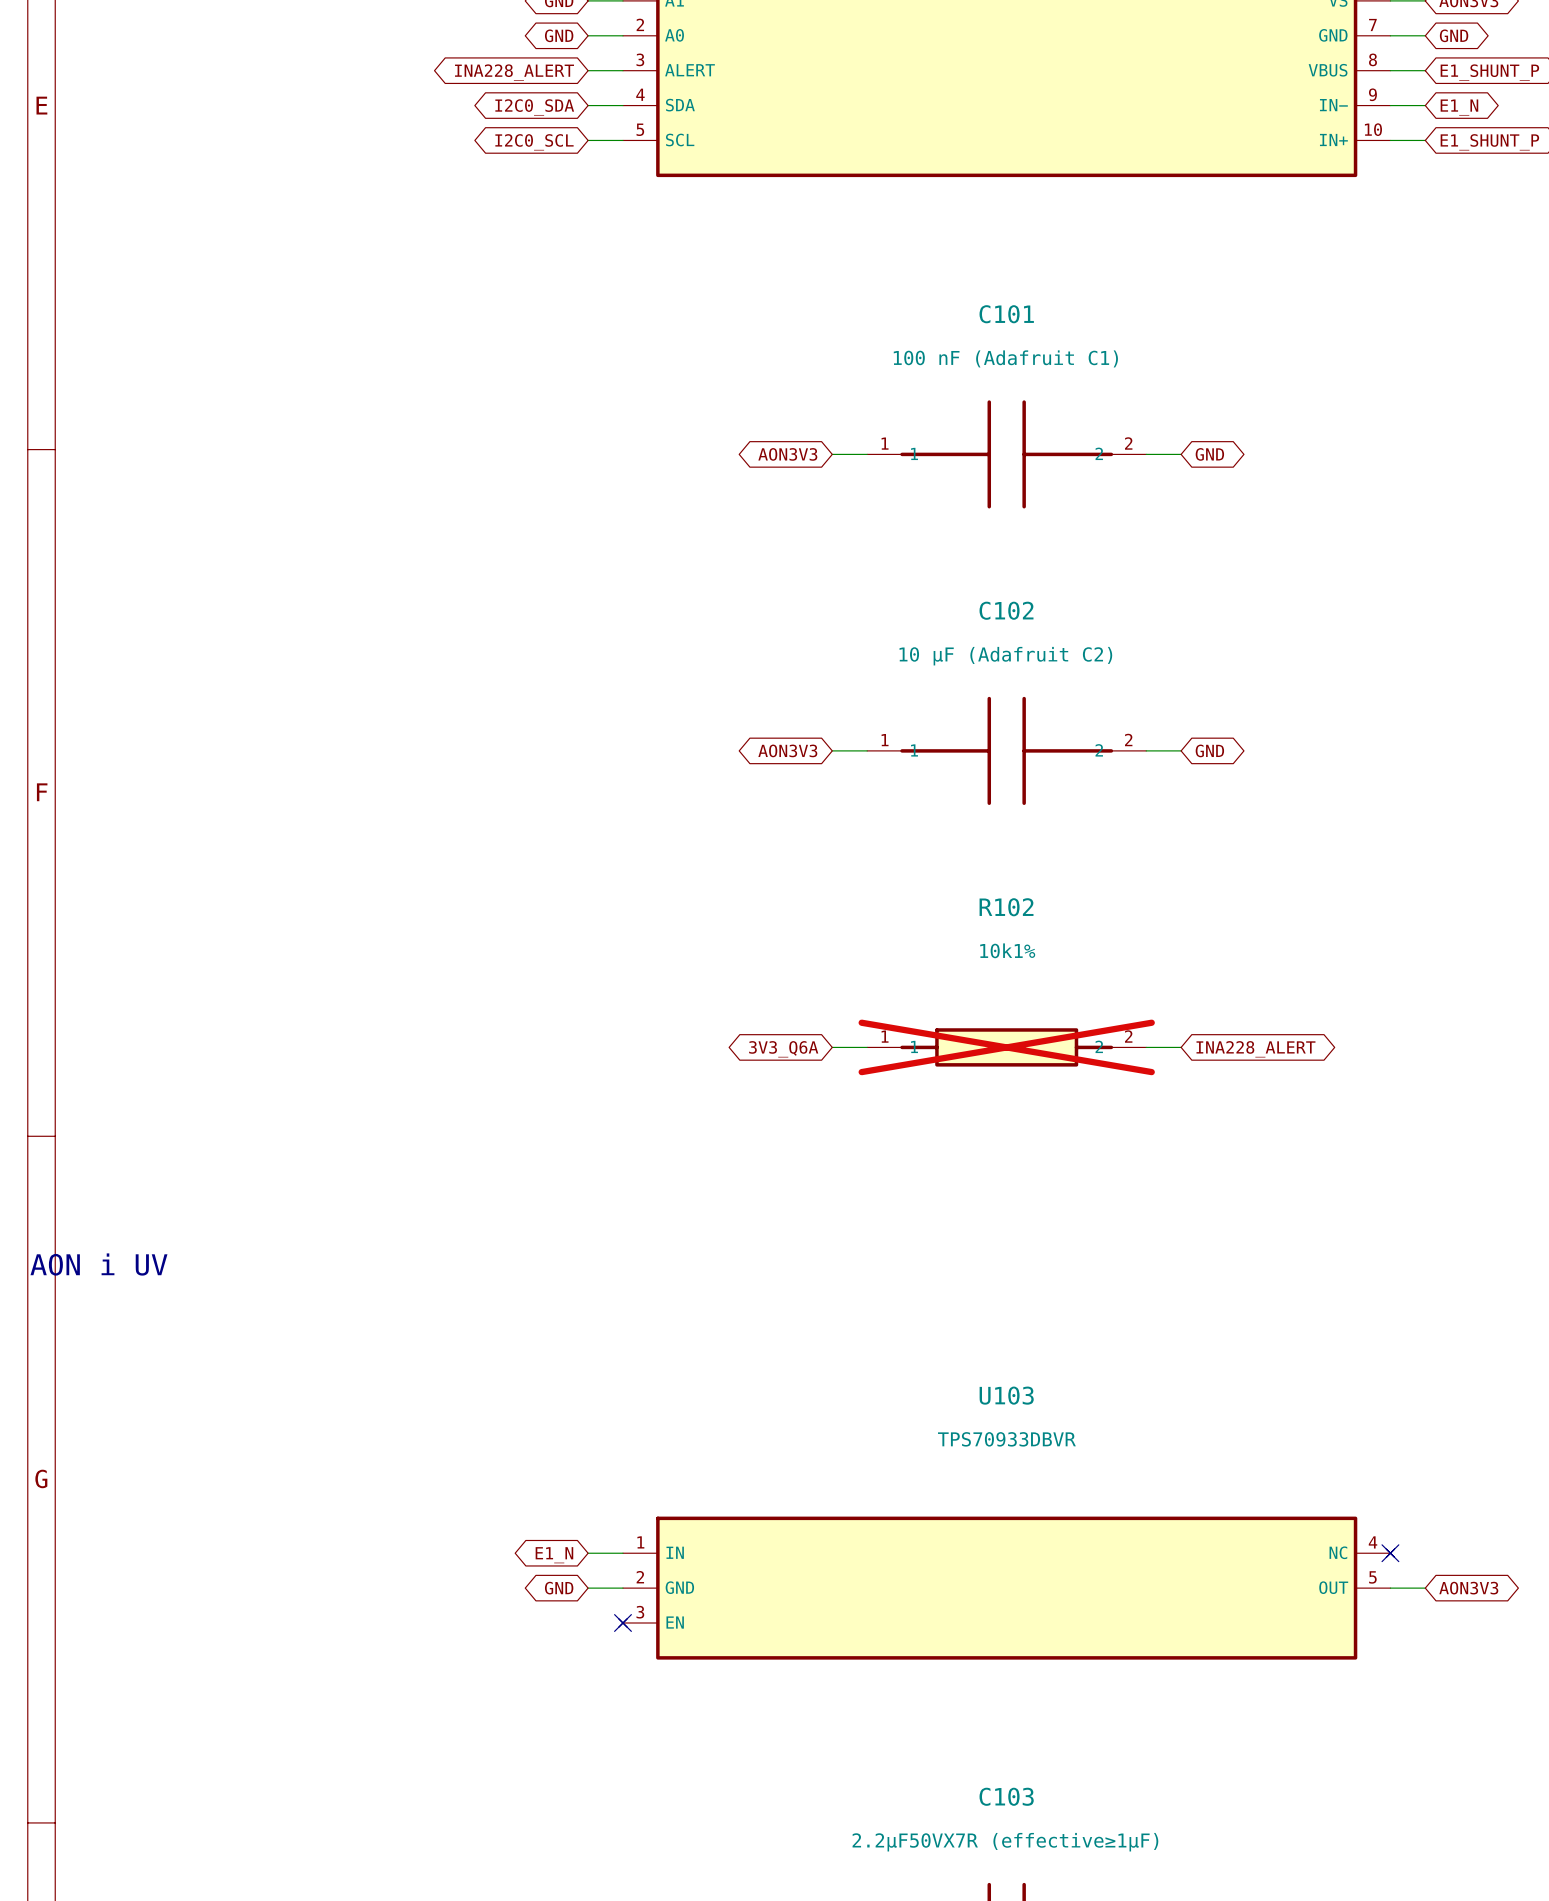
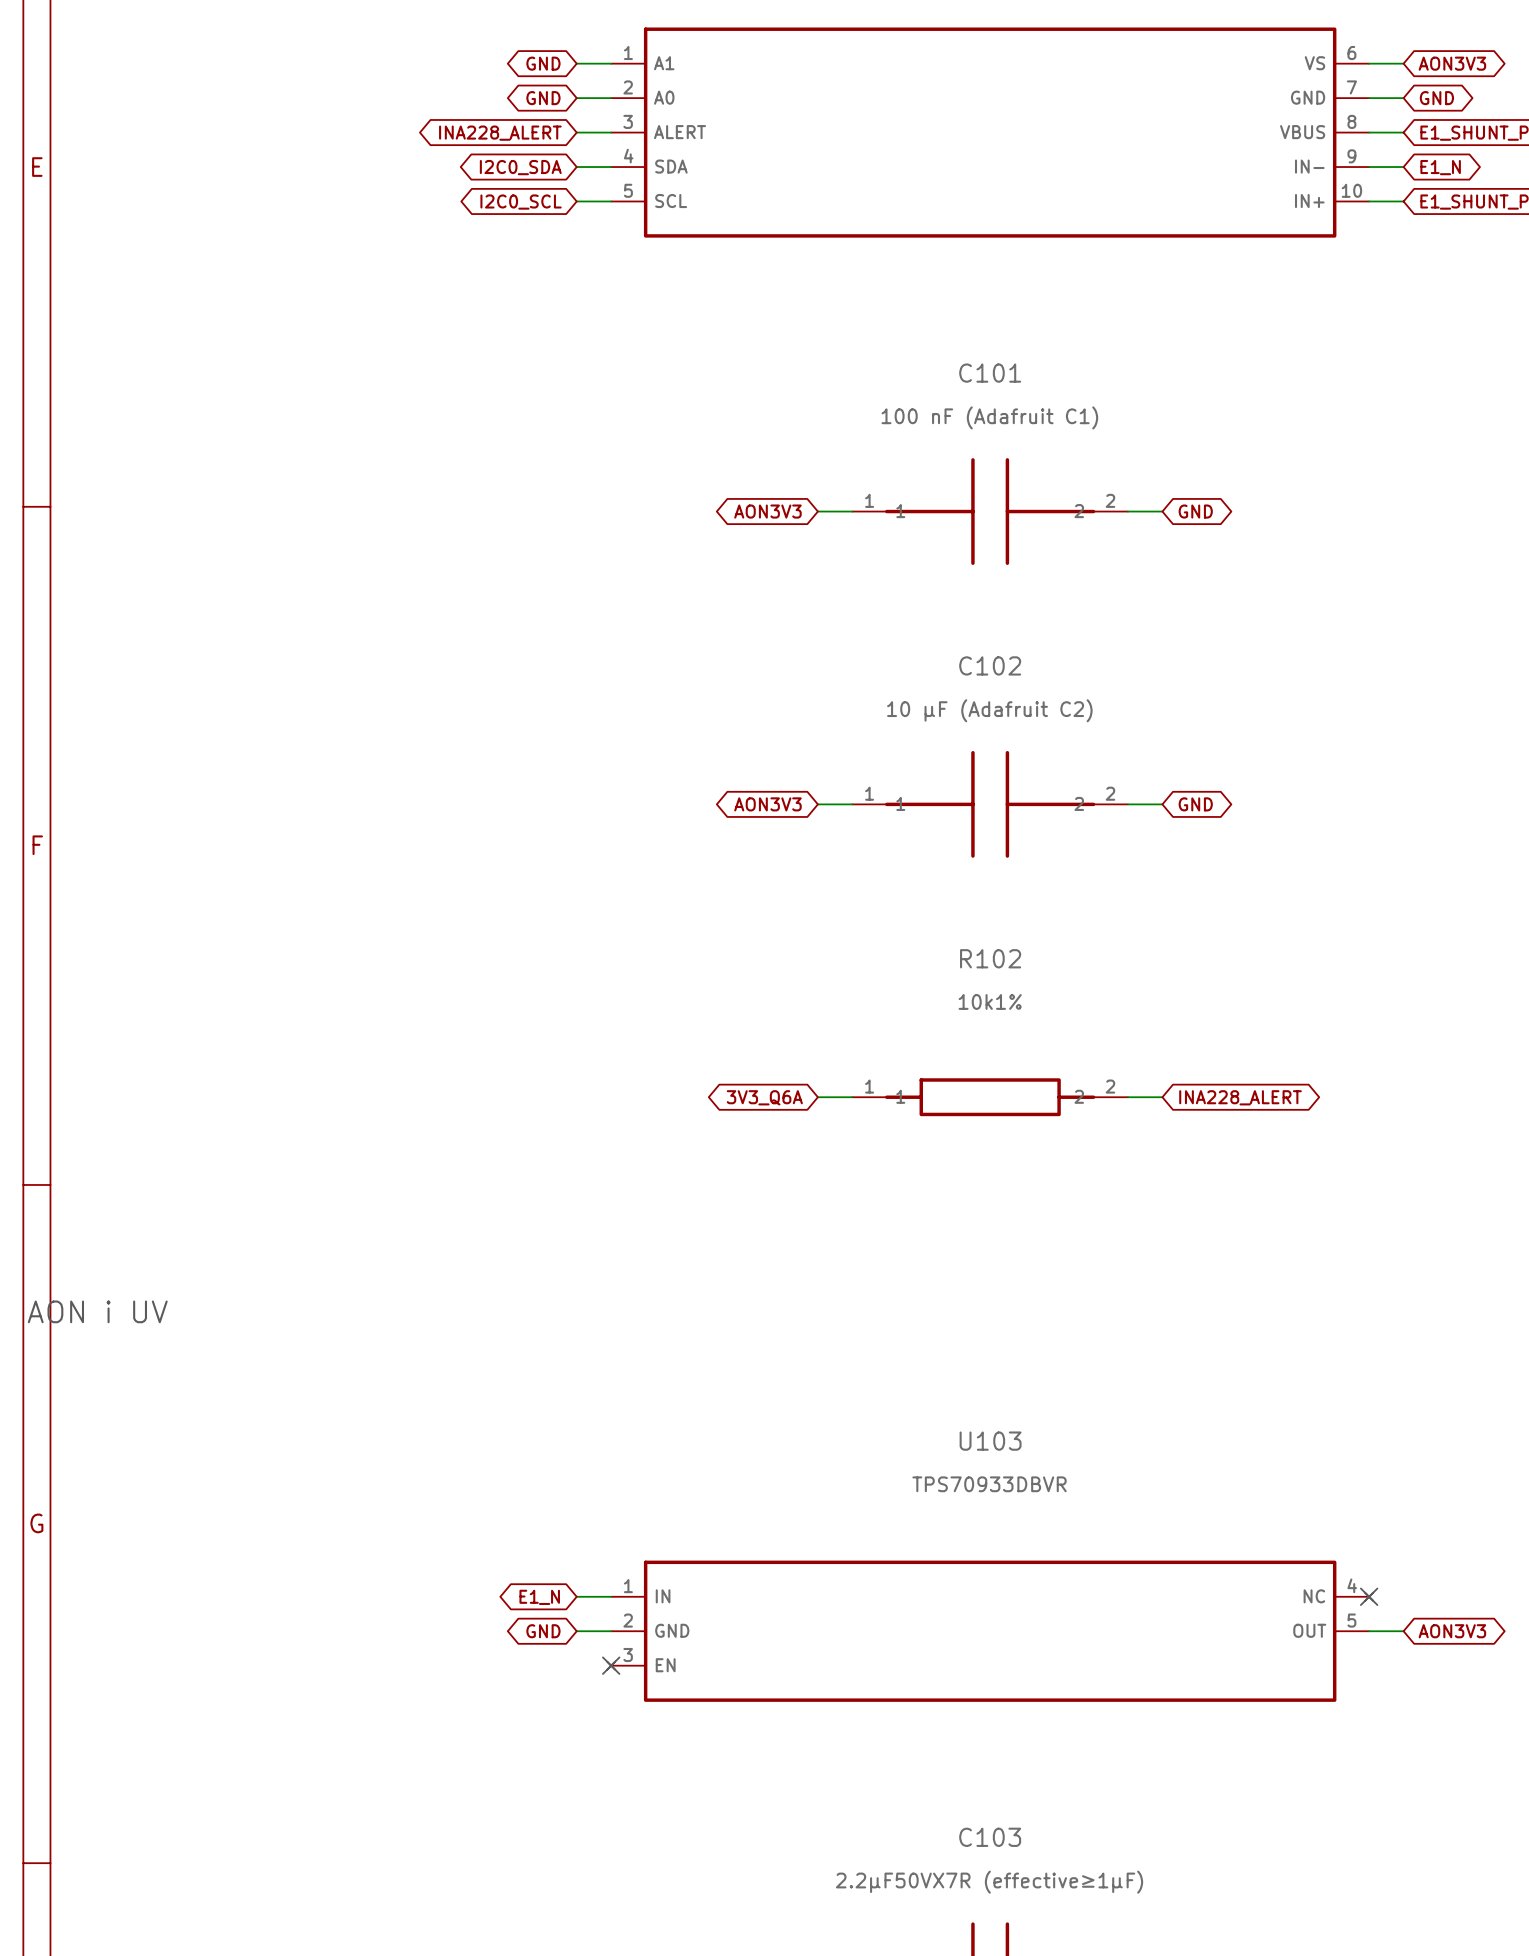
R102 do-not-place cross: (1006, 1047) -> none

